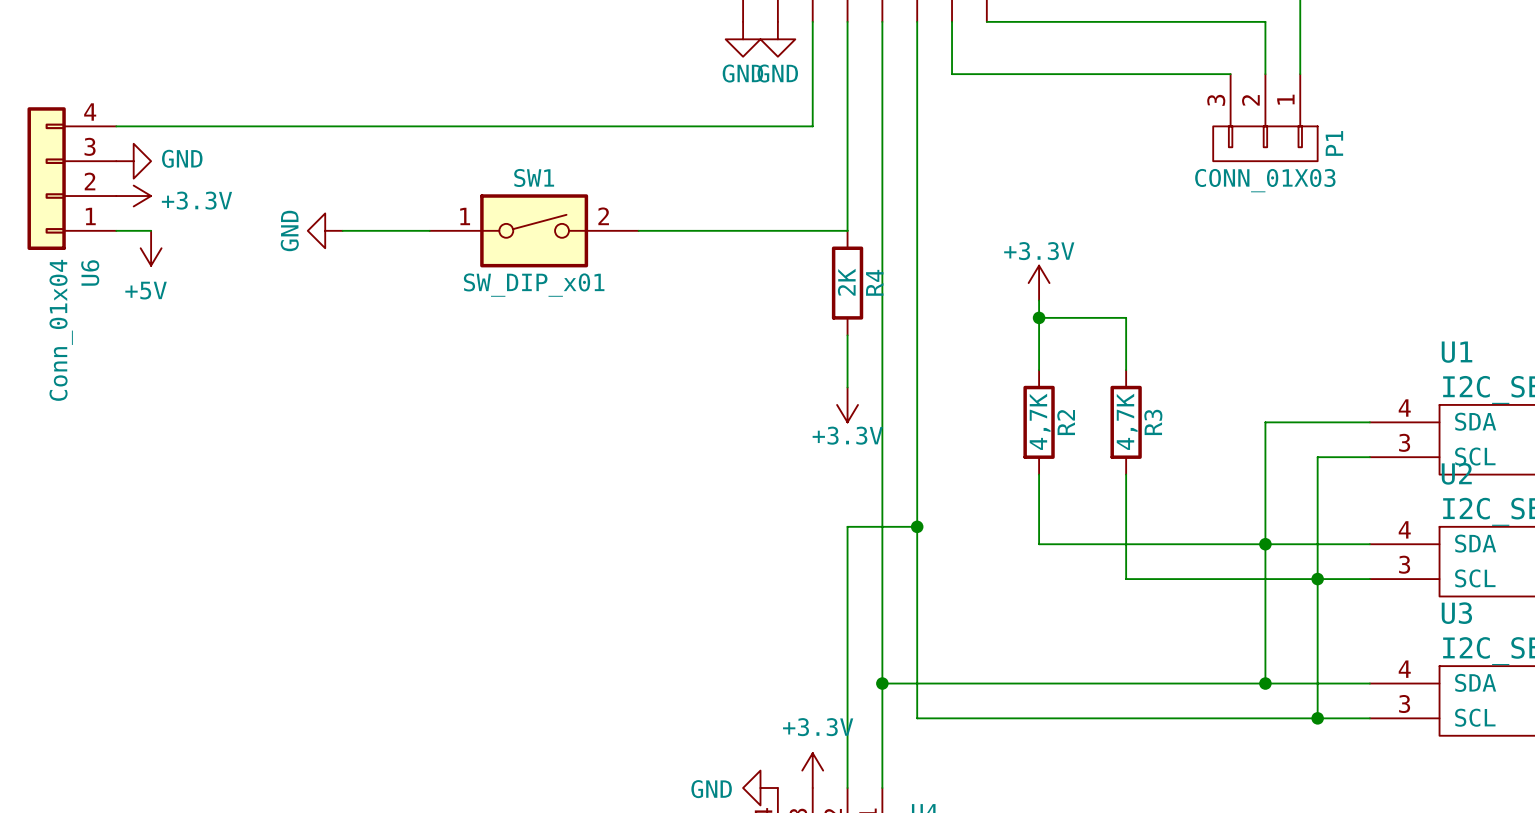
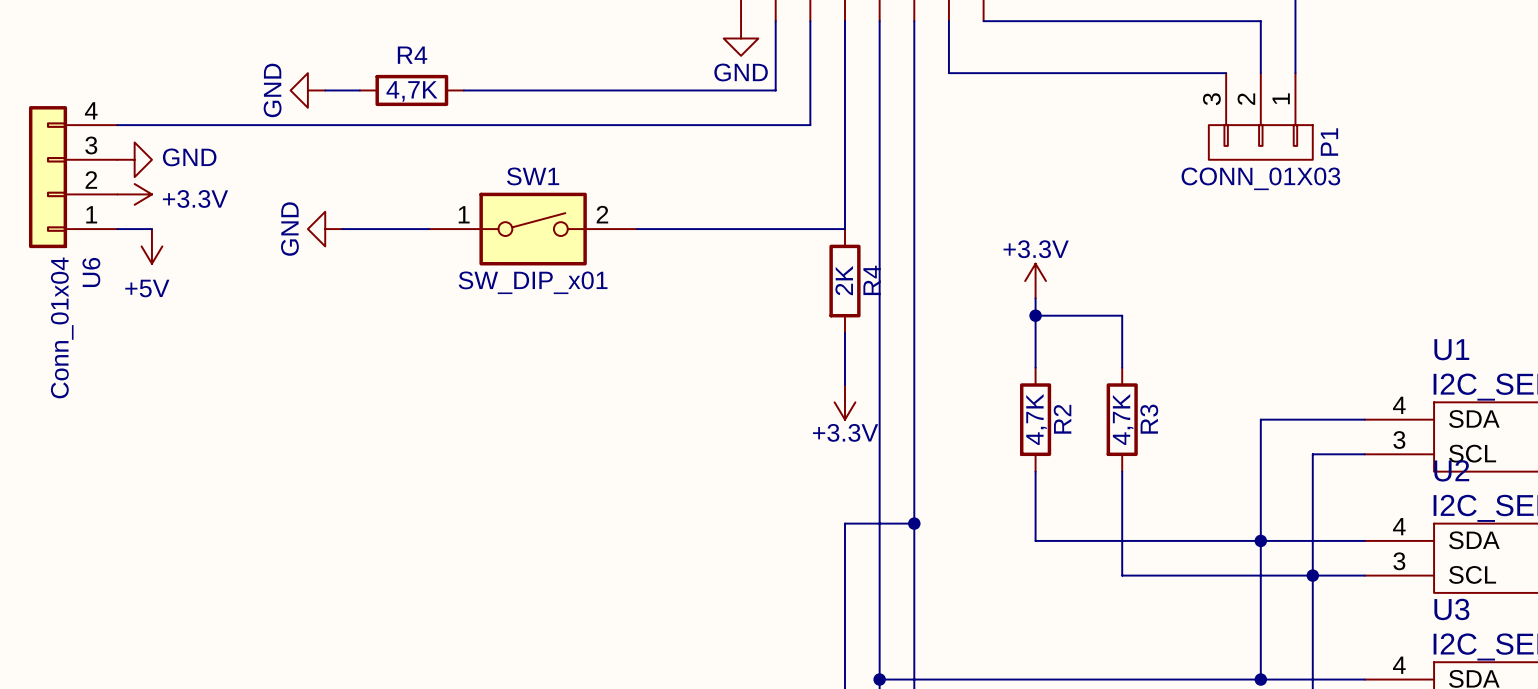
wire: none -> (775, 21) (775, 90) (463, 90)
power symbol: GND (777, 39) -> none
power symbol: none -> GND (307, 90)
wire: none -> (325, 90) (359, 90)
R4: none -> 4,7K (411, 90)

